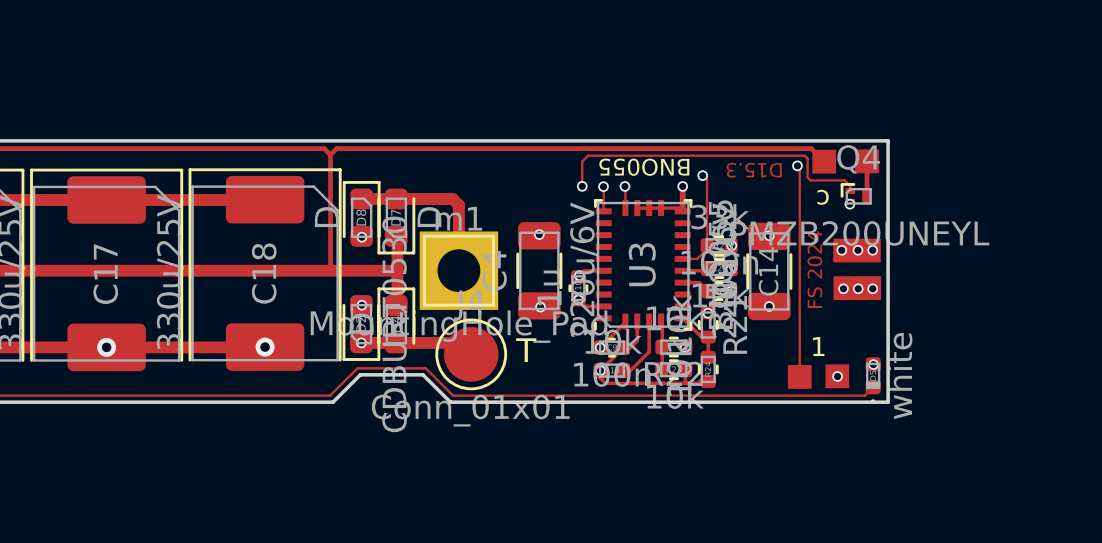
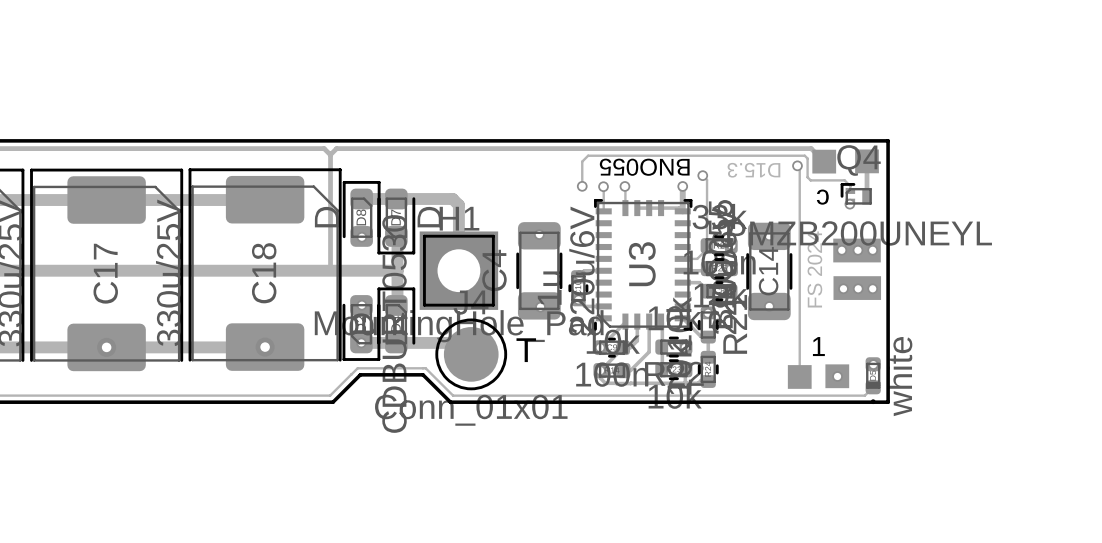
m1 name: m1 (458, 218) -> H1 (459, 218)

